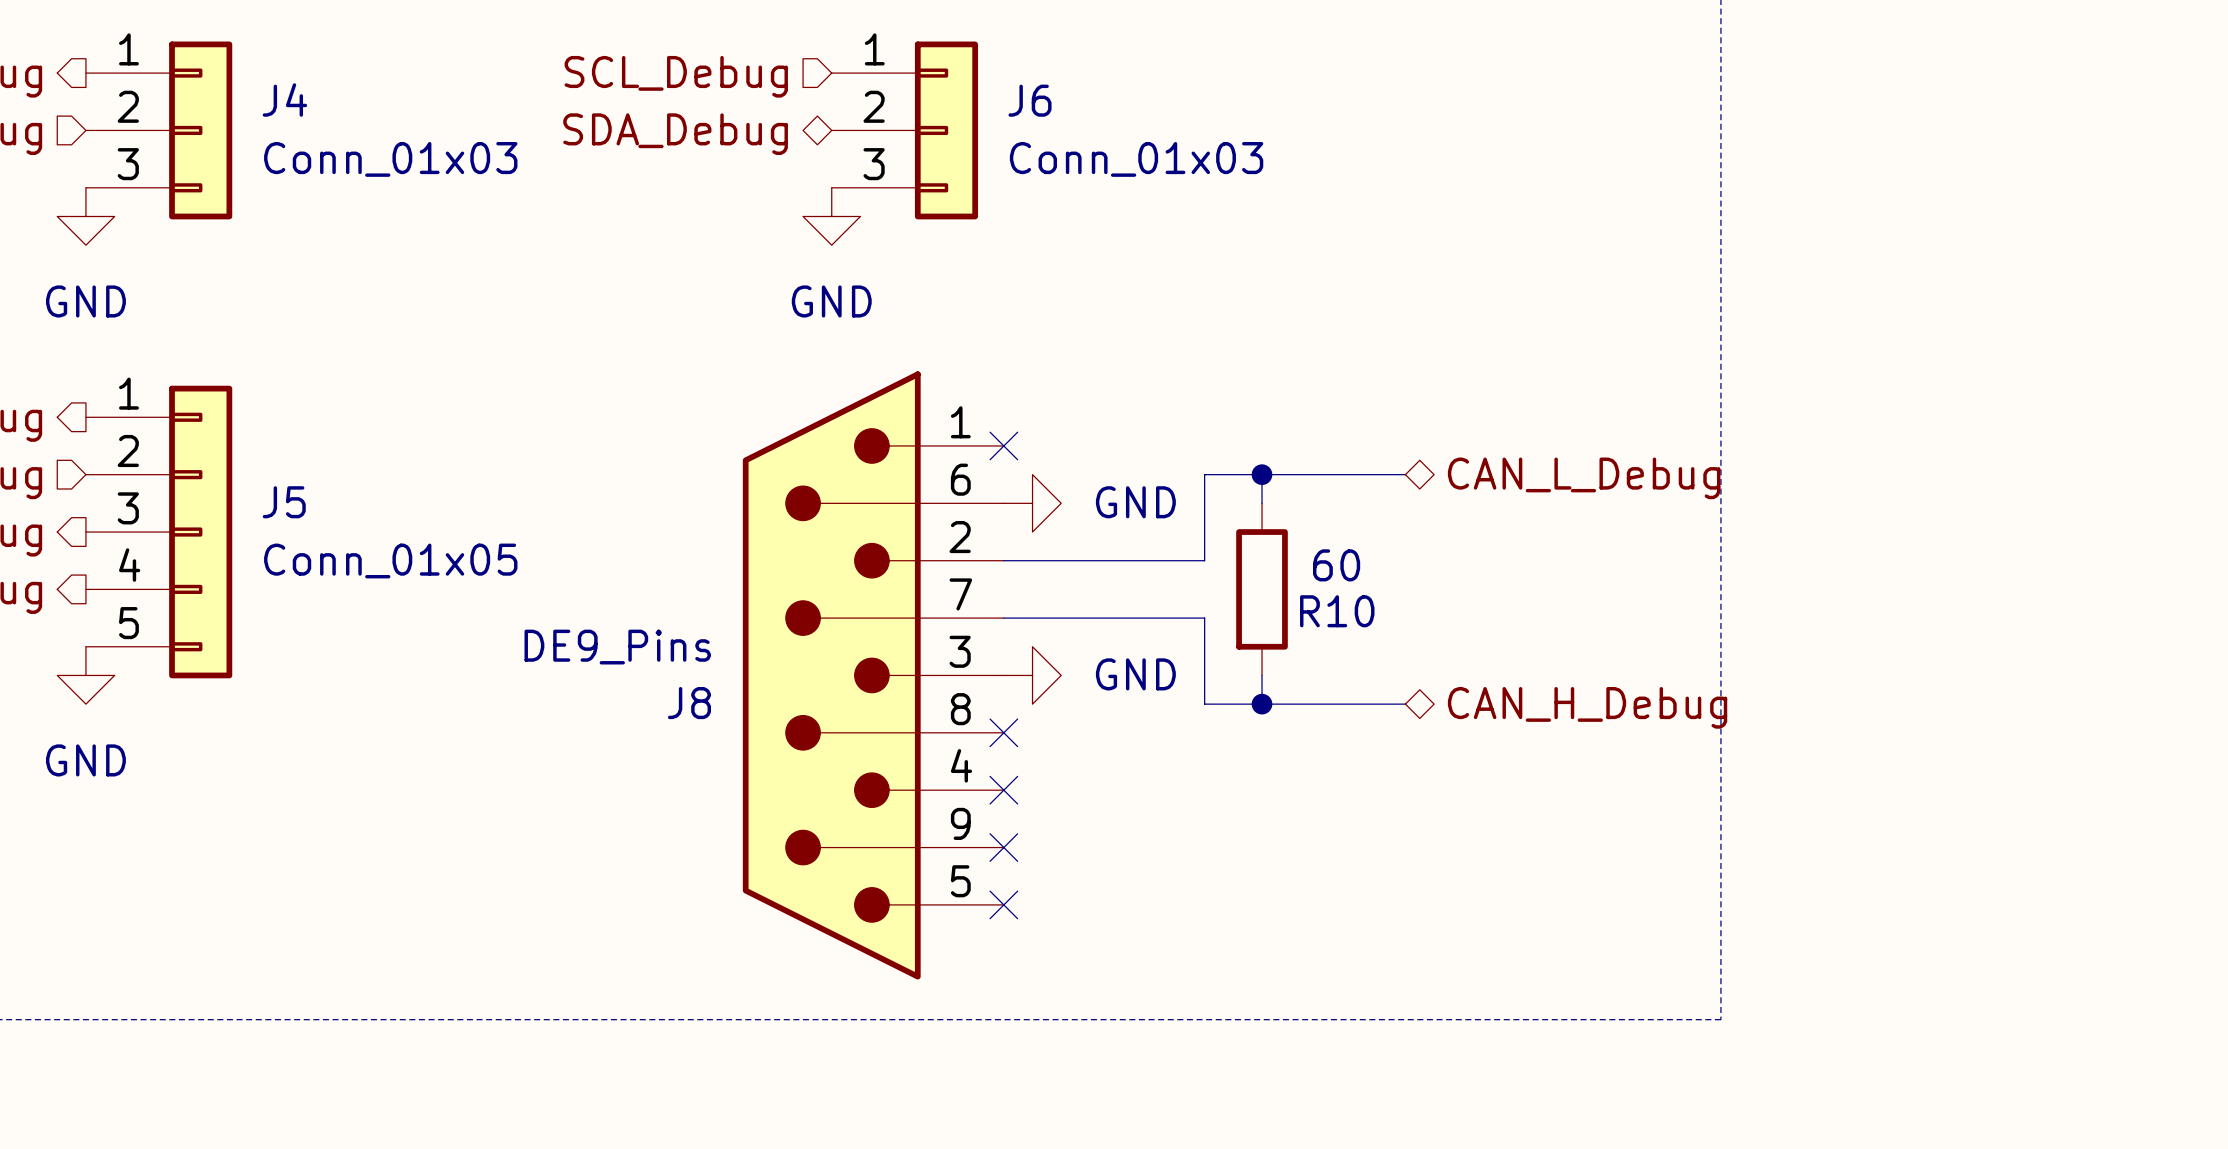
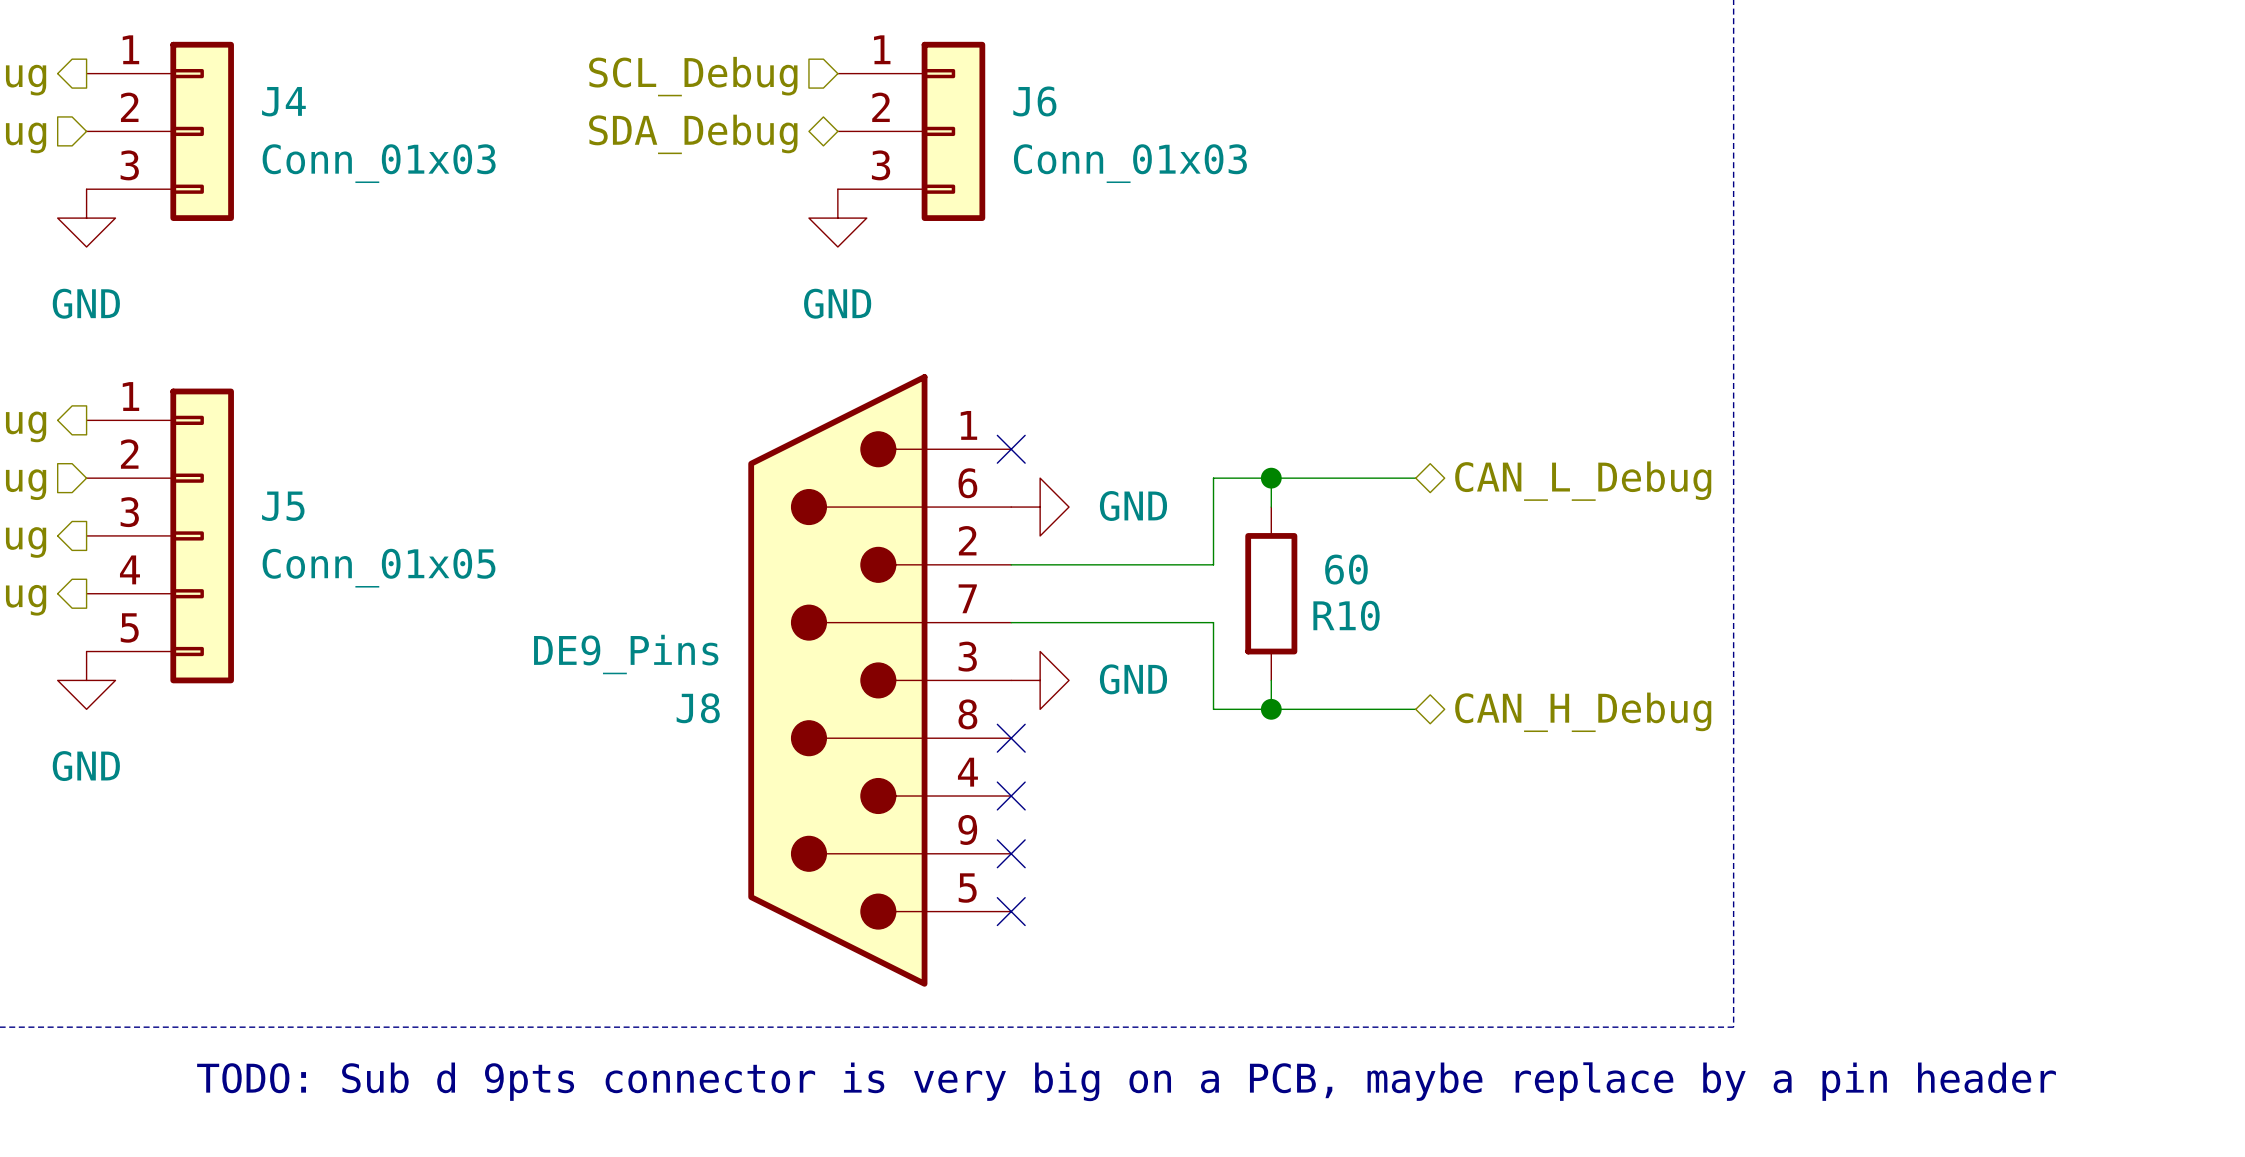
text: none -> TODO: Sub d 9pts connector is very big on a PCB, maybe replace by a pin header (1126, 1081)

